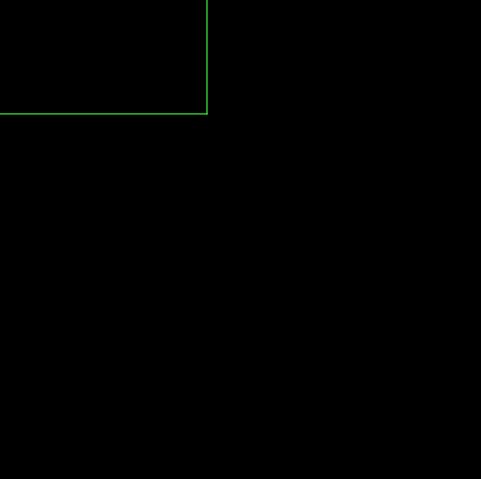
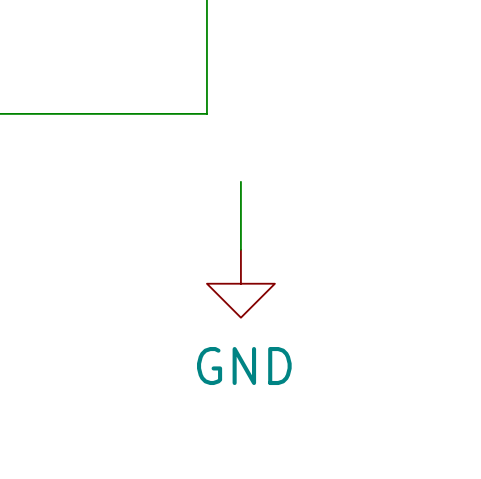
wire: none -> (240, 181) (240, 249)
power symbol: none -> GND (240, 283)

